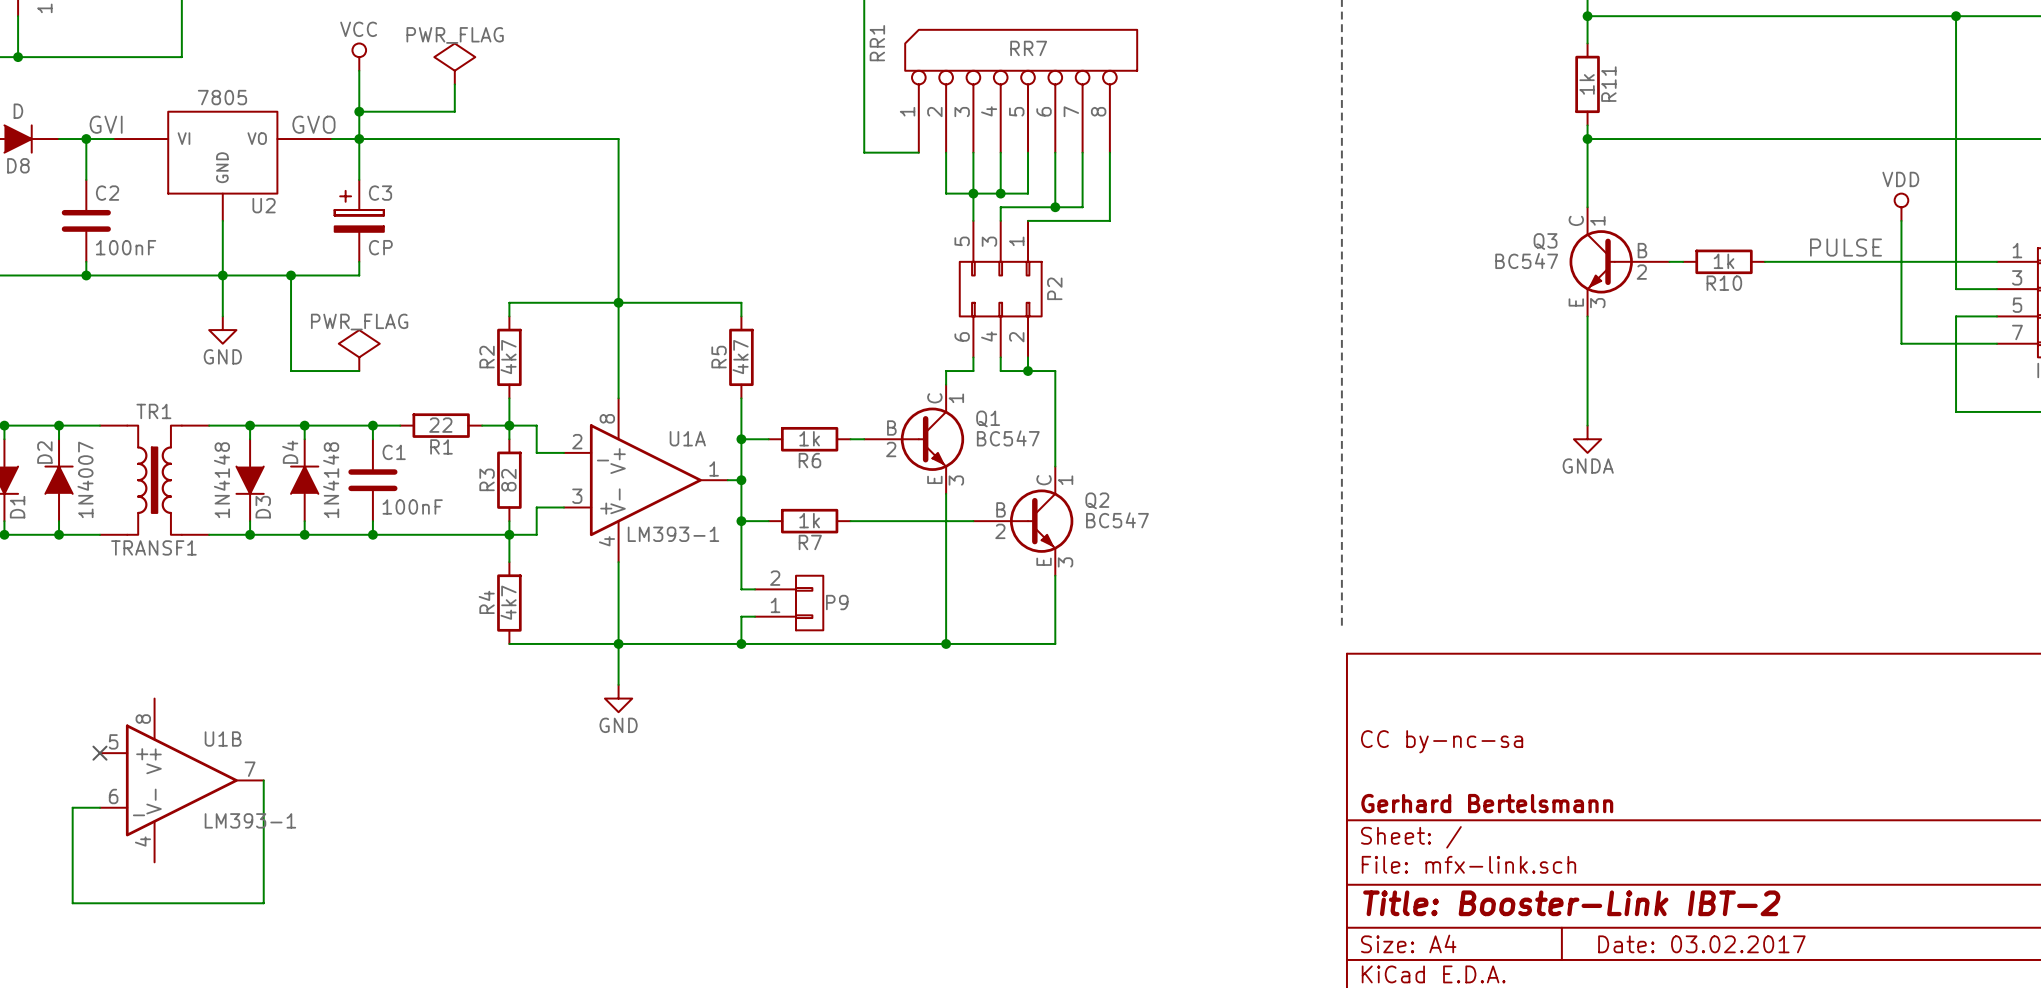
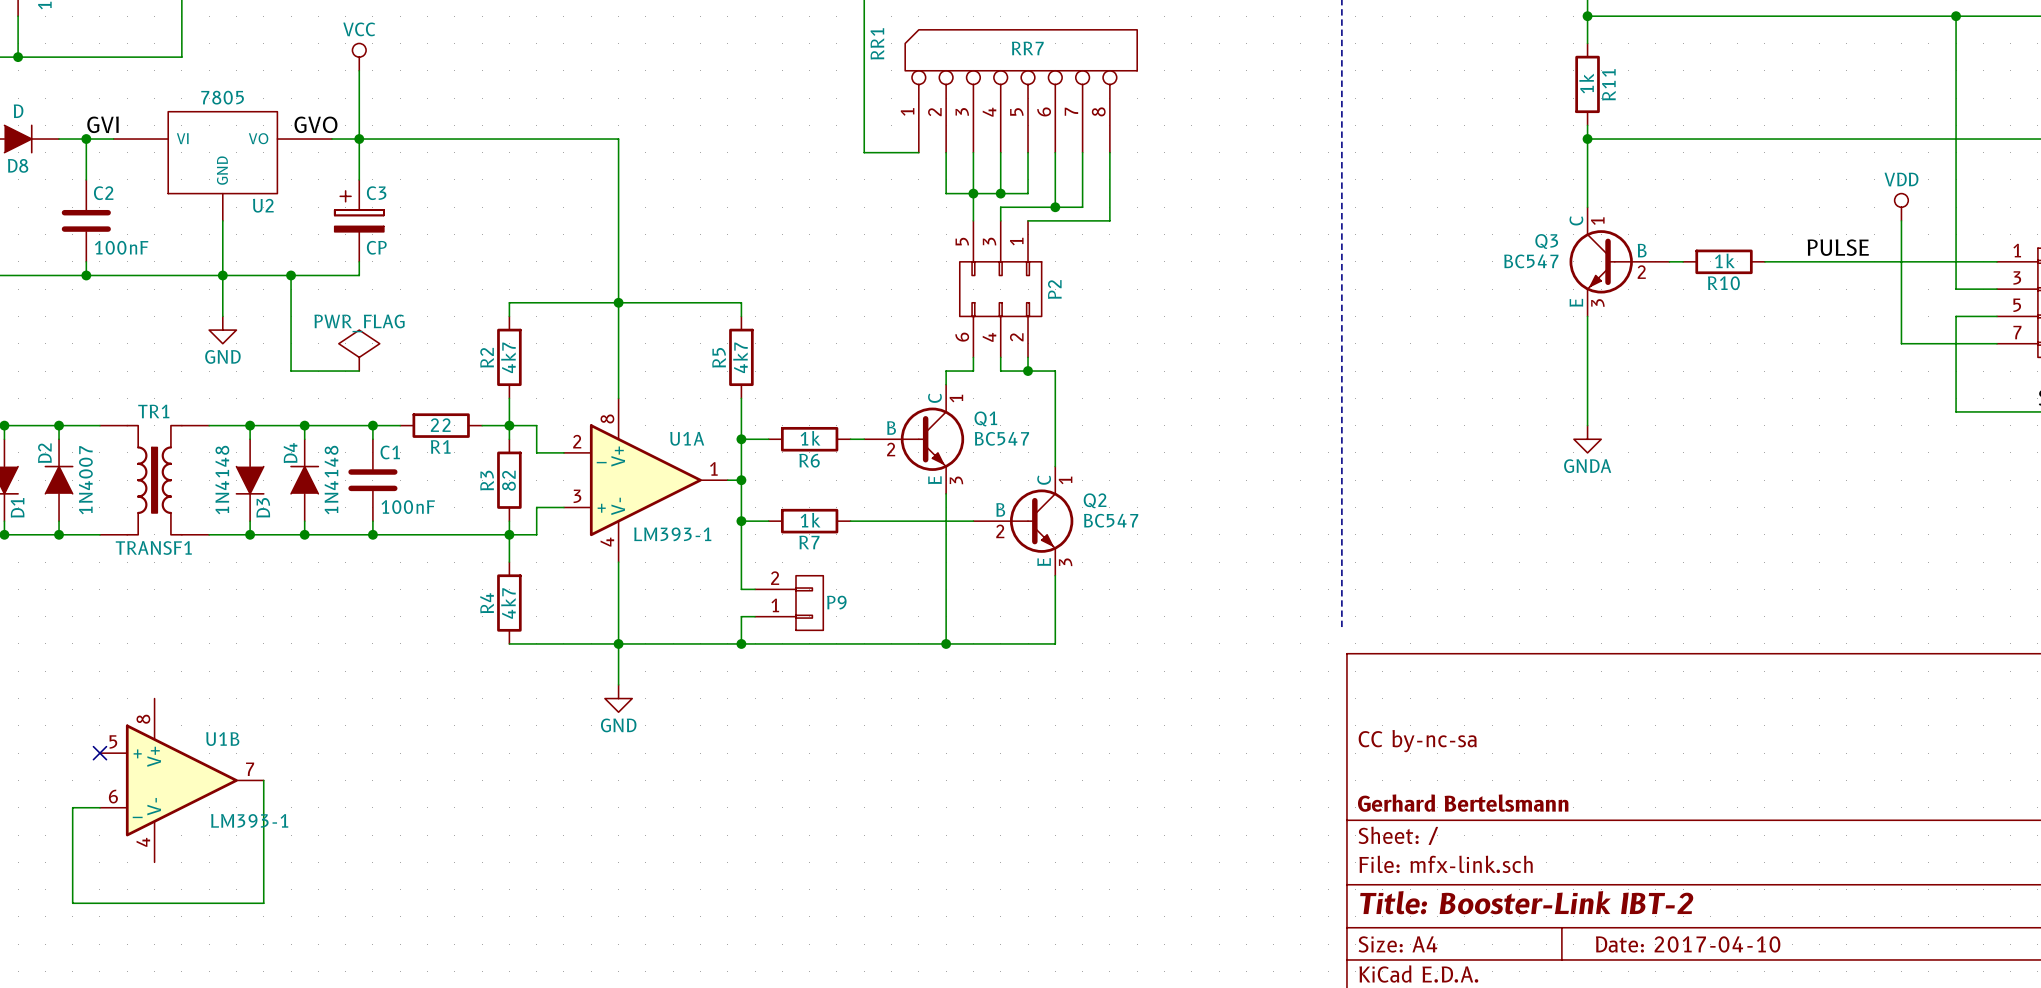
power symbol: PWR_FLAG (454, 63) -> none
wire: (454, 84) (454, 111) (359, 111) -> none
junction: (359, 111) -> none
title block: Date: 03.02.2017 (1701, 944) -> Date: 2017-04-10 (1688, 944)

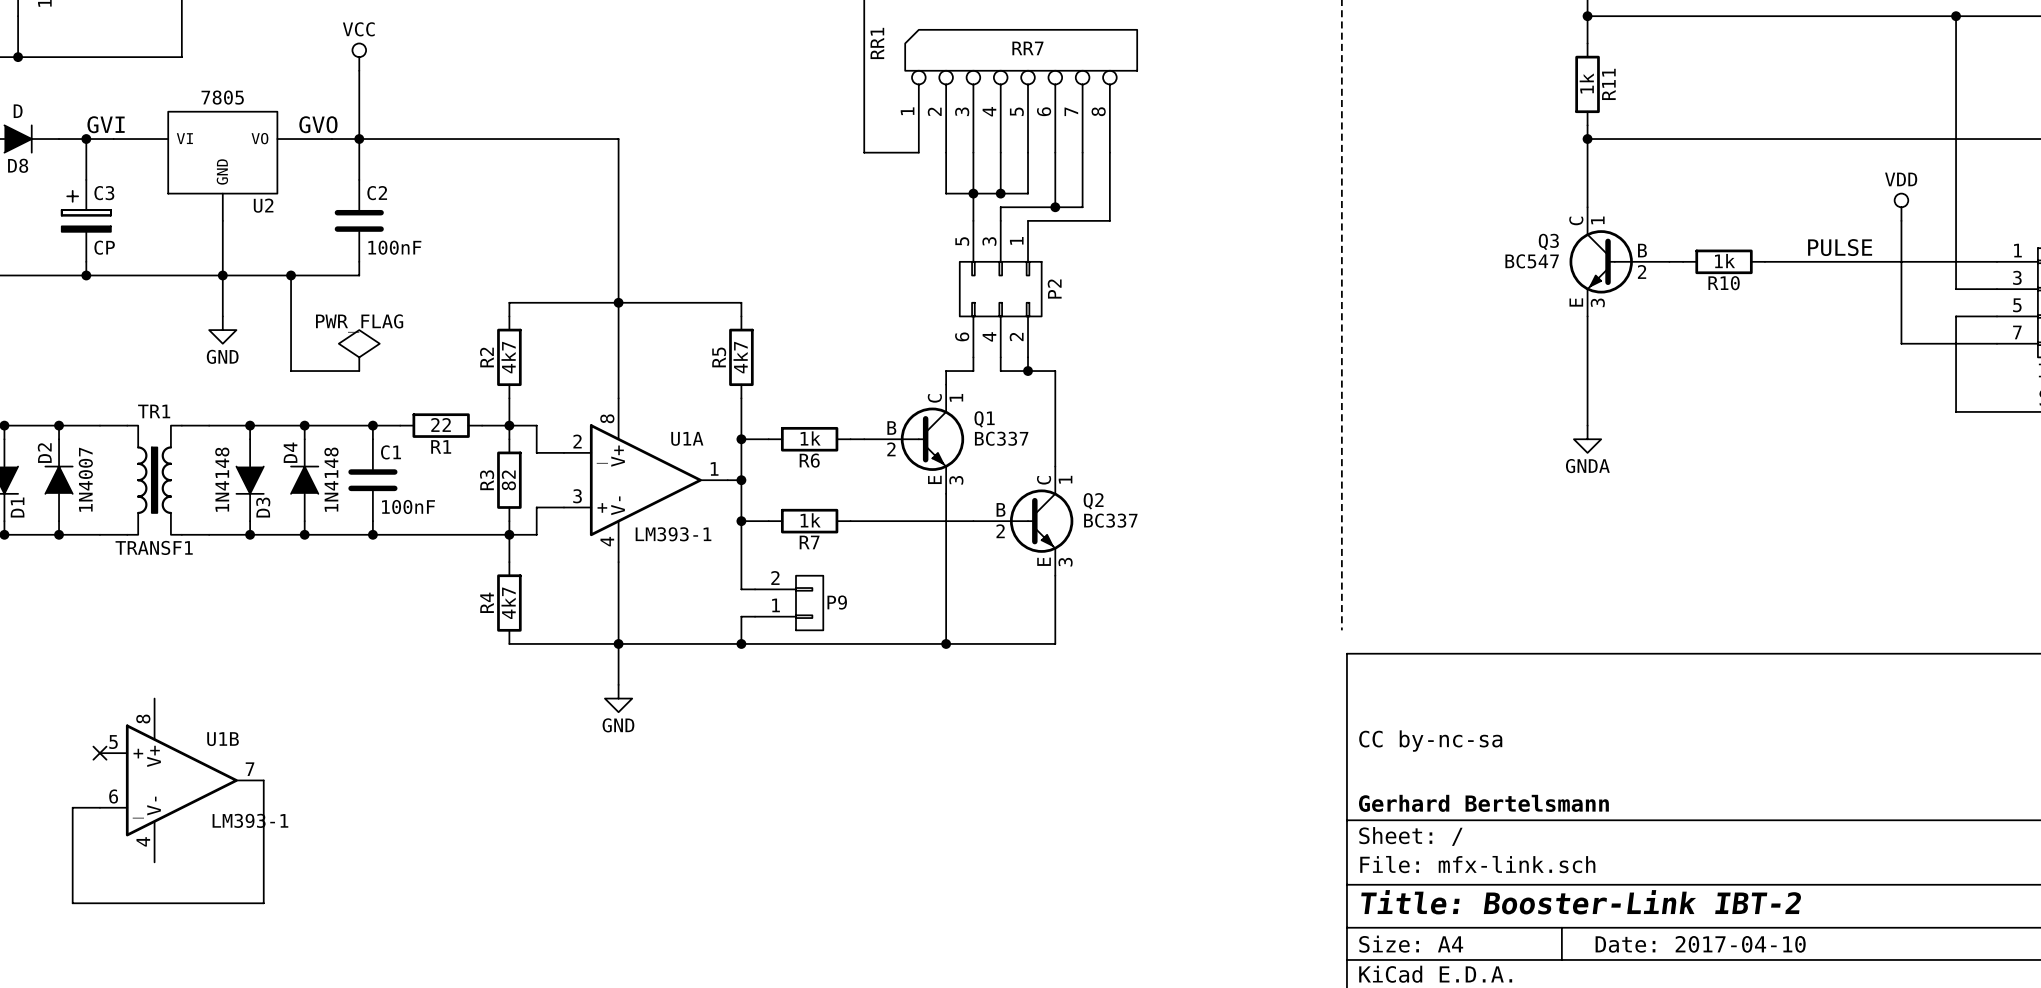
C2 position: (86, 220) -> (359, 220)
C3 position: (359, 220) -> (86, 220)
Q1 value: BC547 (1001, 438) -> BC337 (1001, 438)
Q2 value: BC547 (1111, 520) -> BC337 (1110, 520)

